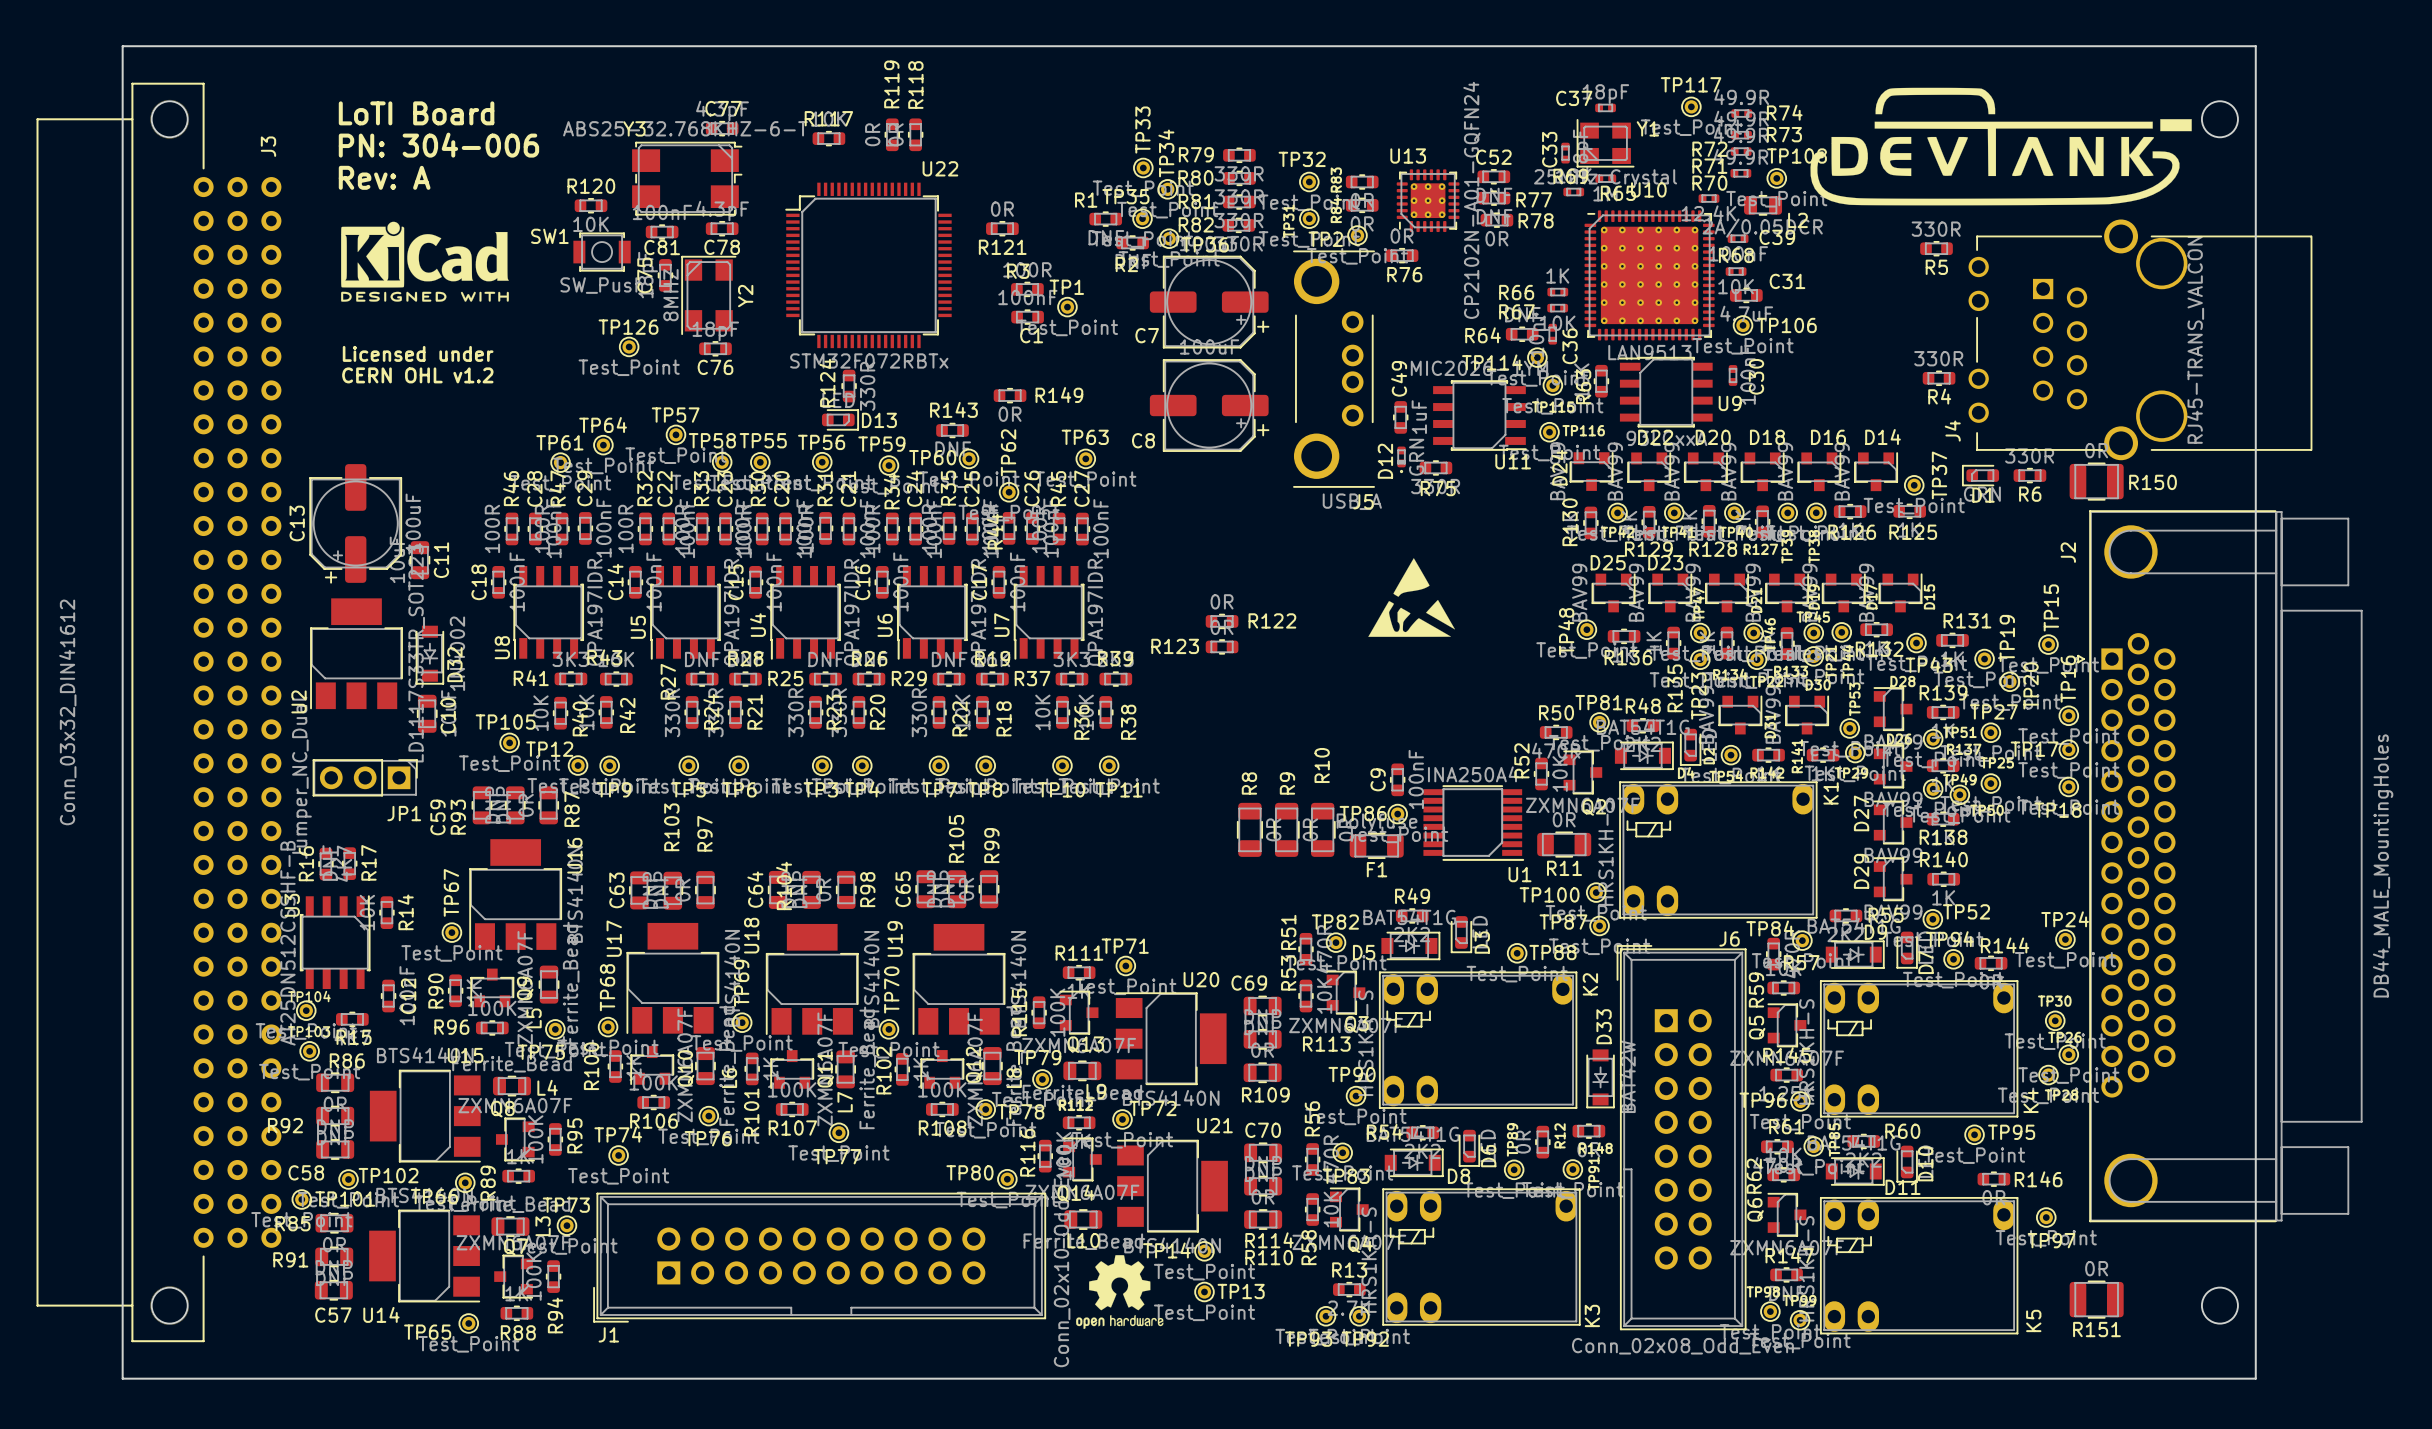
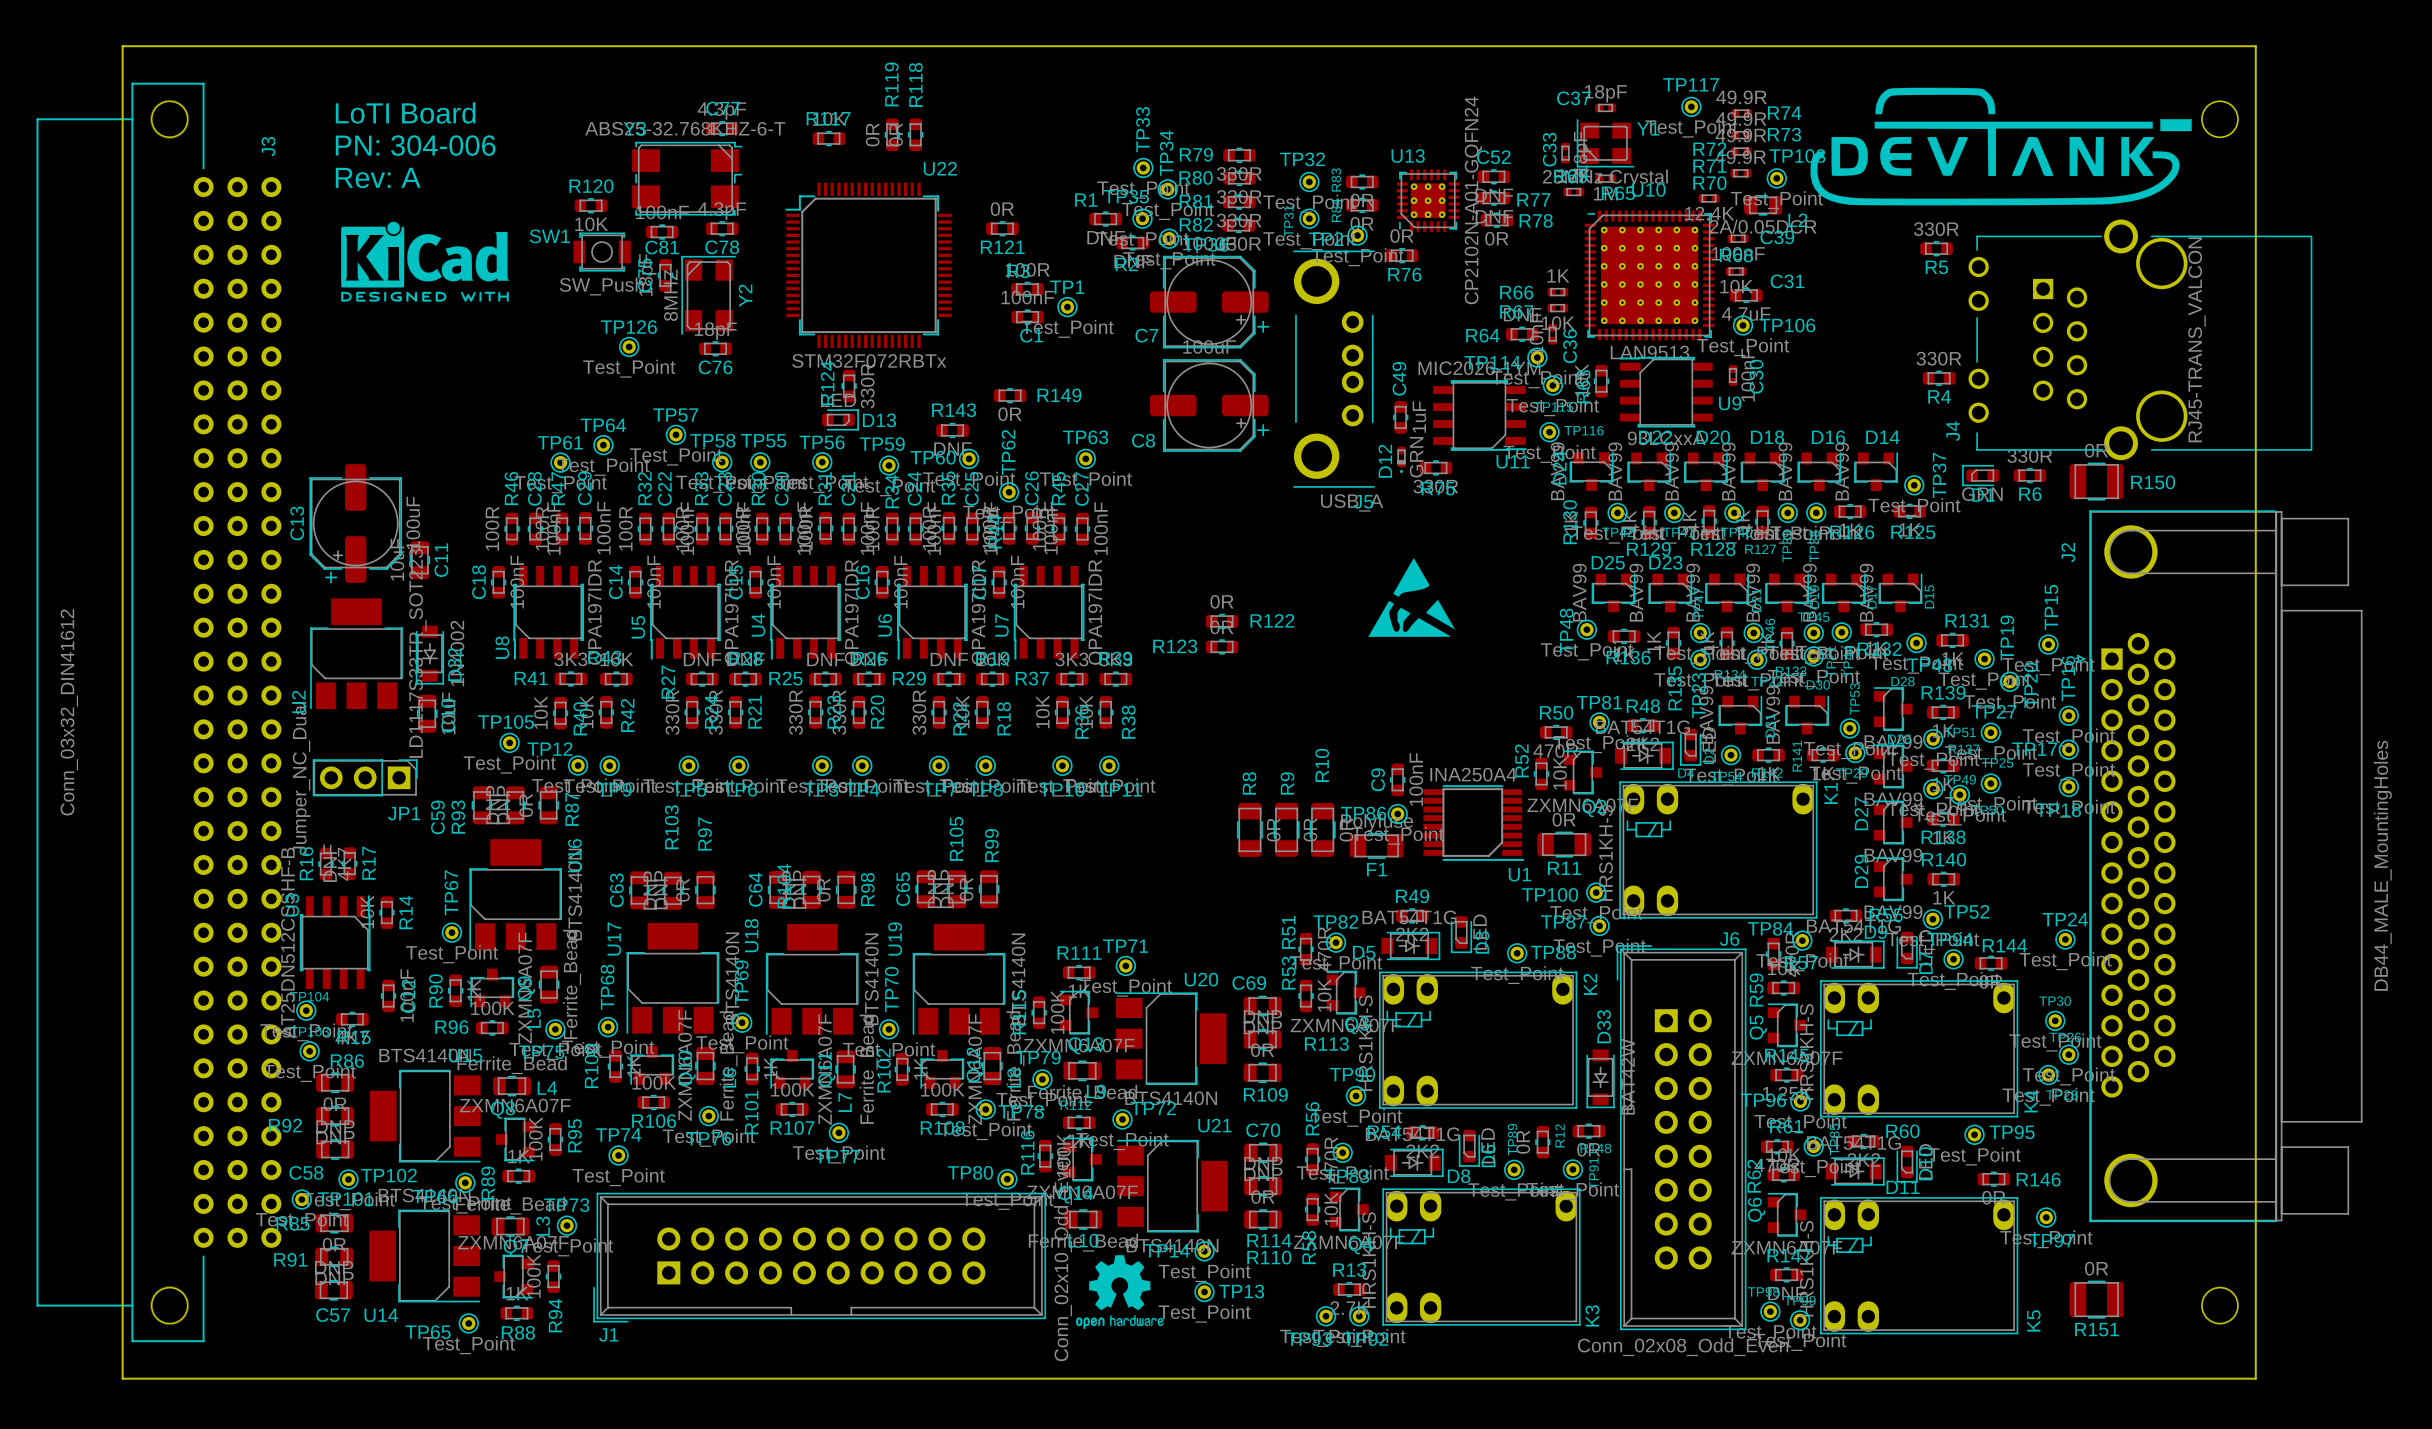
text: Licensed under (418, 353) -> none
text: CERN OHL v1.2 (417, 375) -> none

